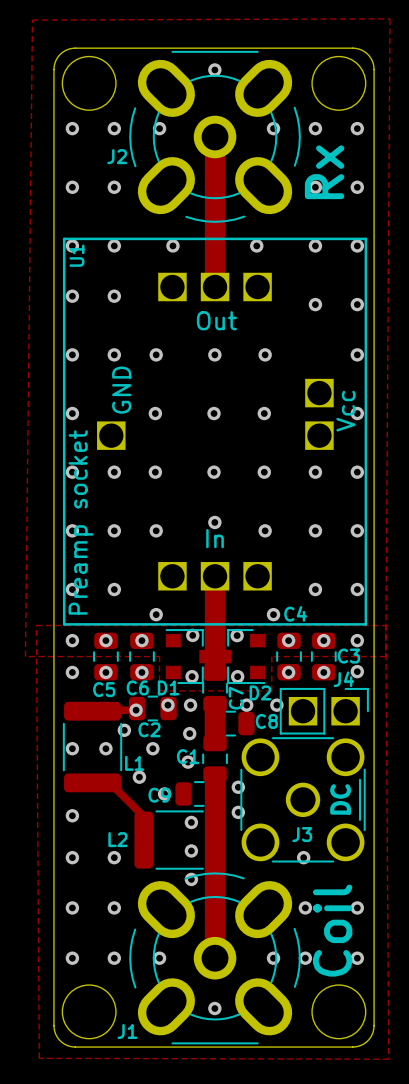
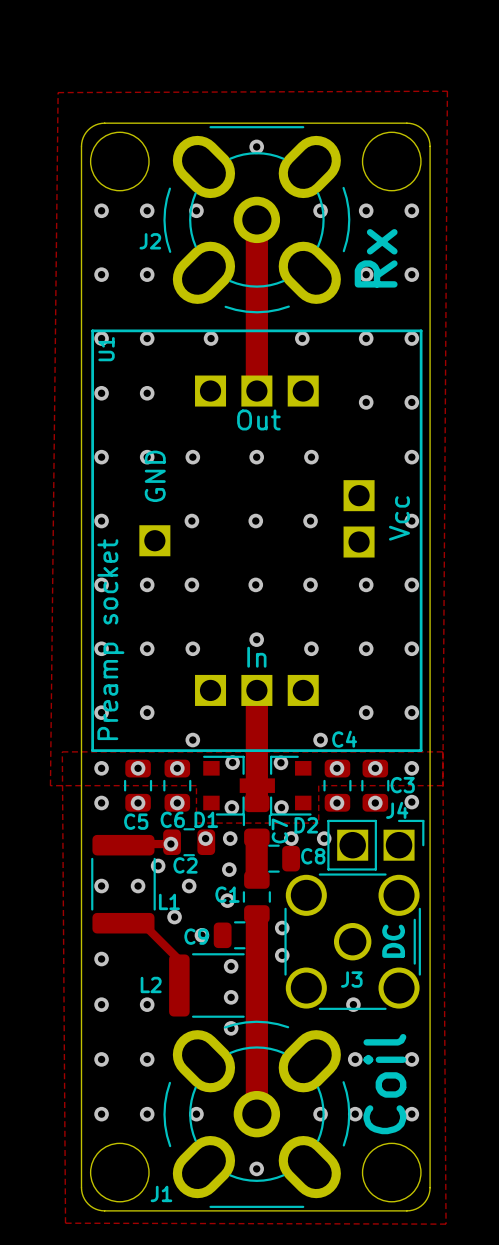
U1 footprint: [62, 237, 368, 626] -> [91, 329, 423, 752]

